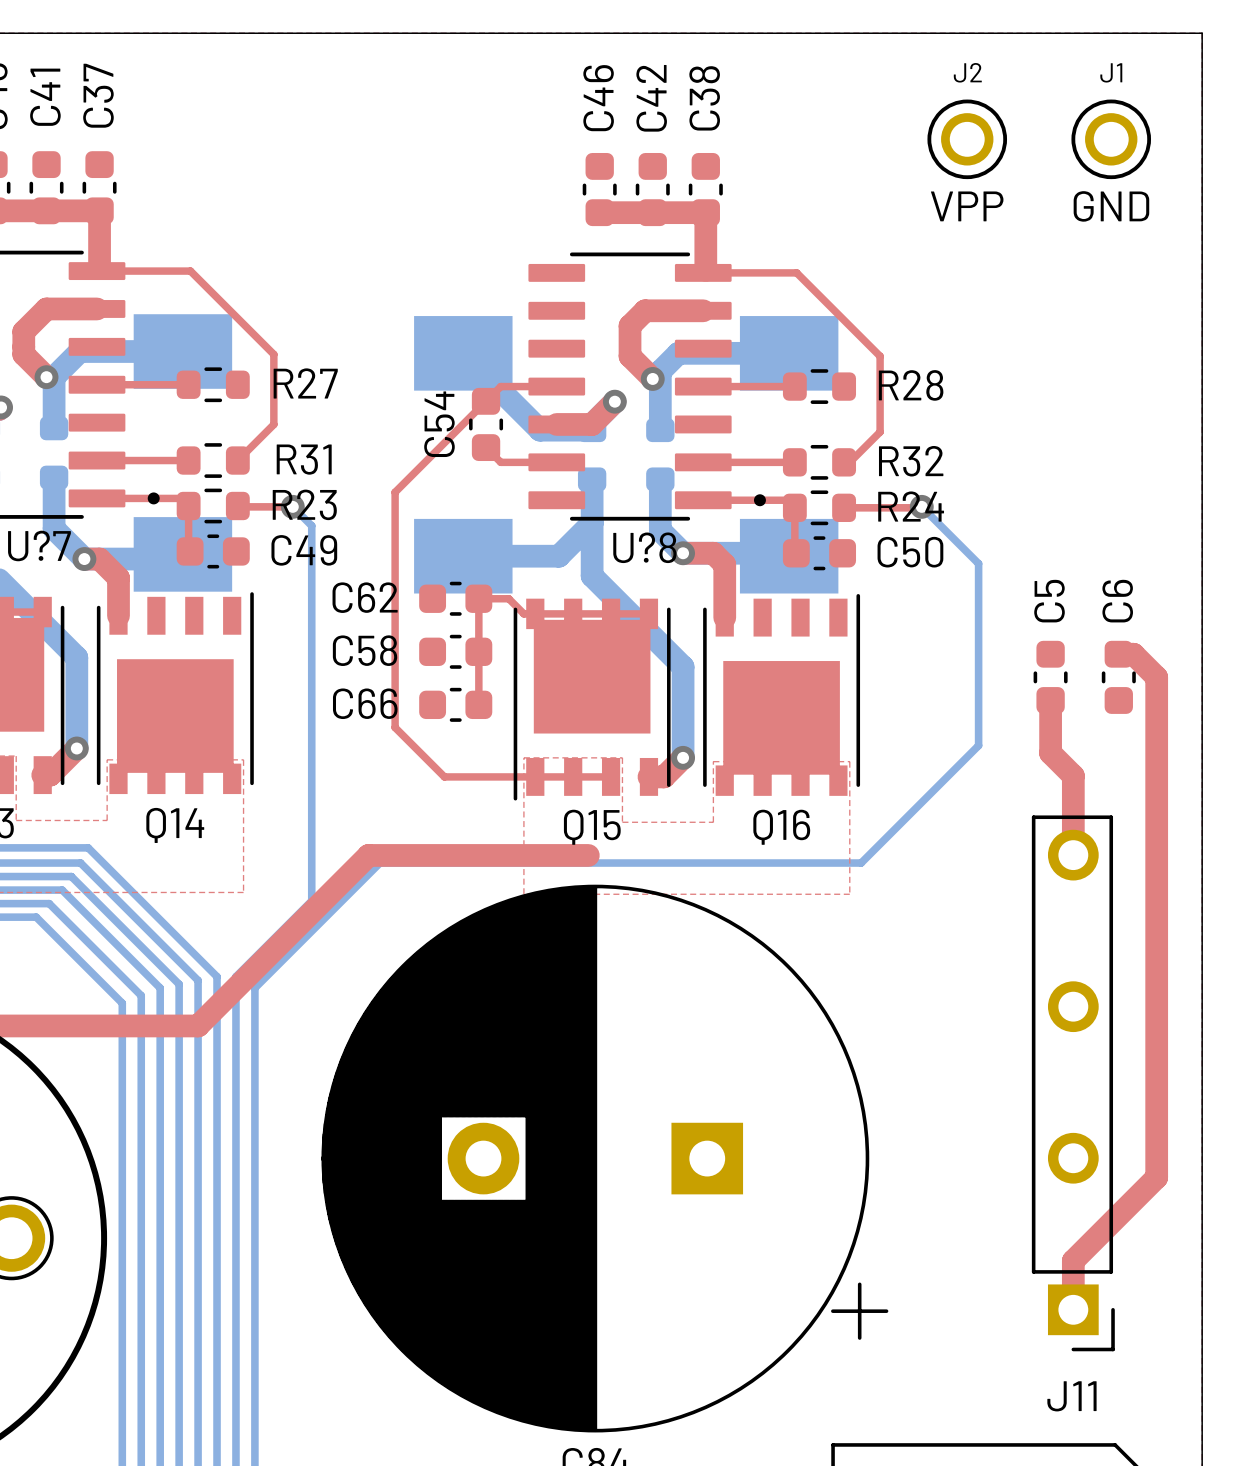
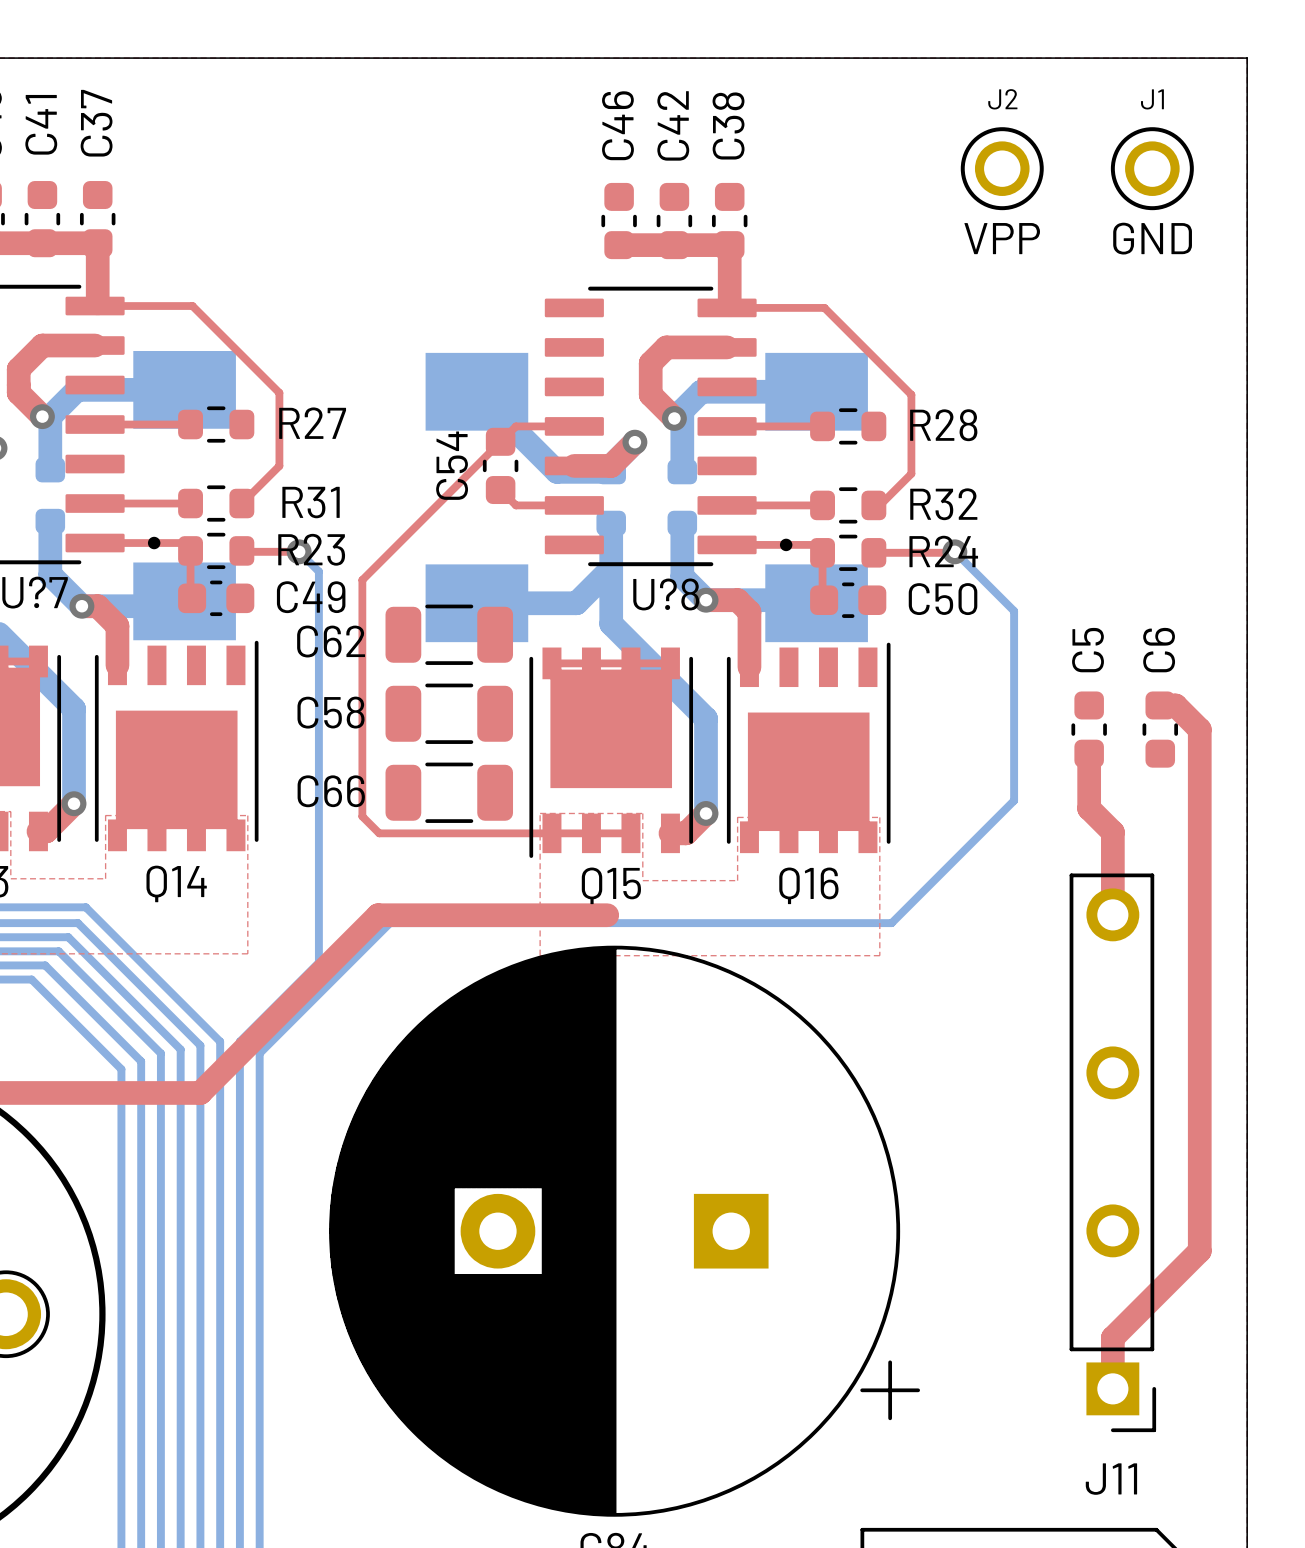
top track: (395, 492) (395, 727) (444, 776) -> (405, 536) (362, 580) (362, 816) (379, 833) (457, 833)
C62 footprint: [419, 581, 493, 616] -> [385, 604, 514, 665]
top track: (535, 613) (523, 613) (508, 598) (478, 598) (478, 704) -> none
C58 footprint: [419, 634, 493, 669] -> [385, 683, 514, 744]
C66 footprint: [419, 687, 493, 722] -> [385, 762, 514, 823]

